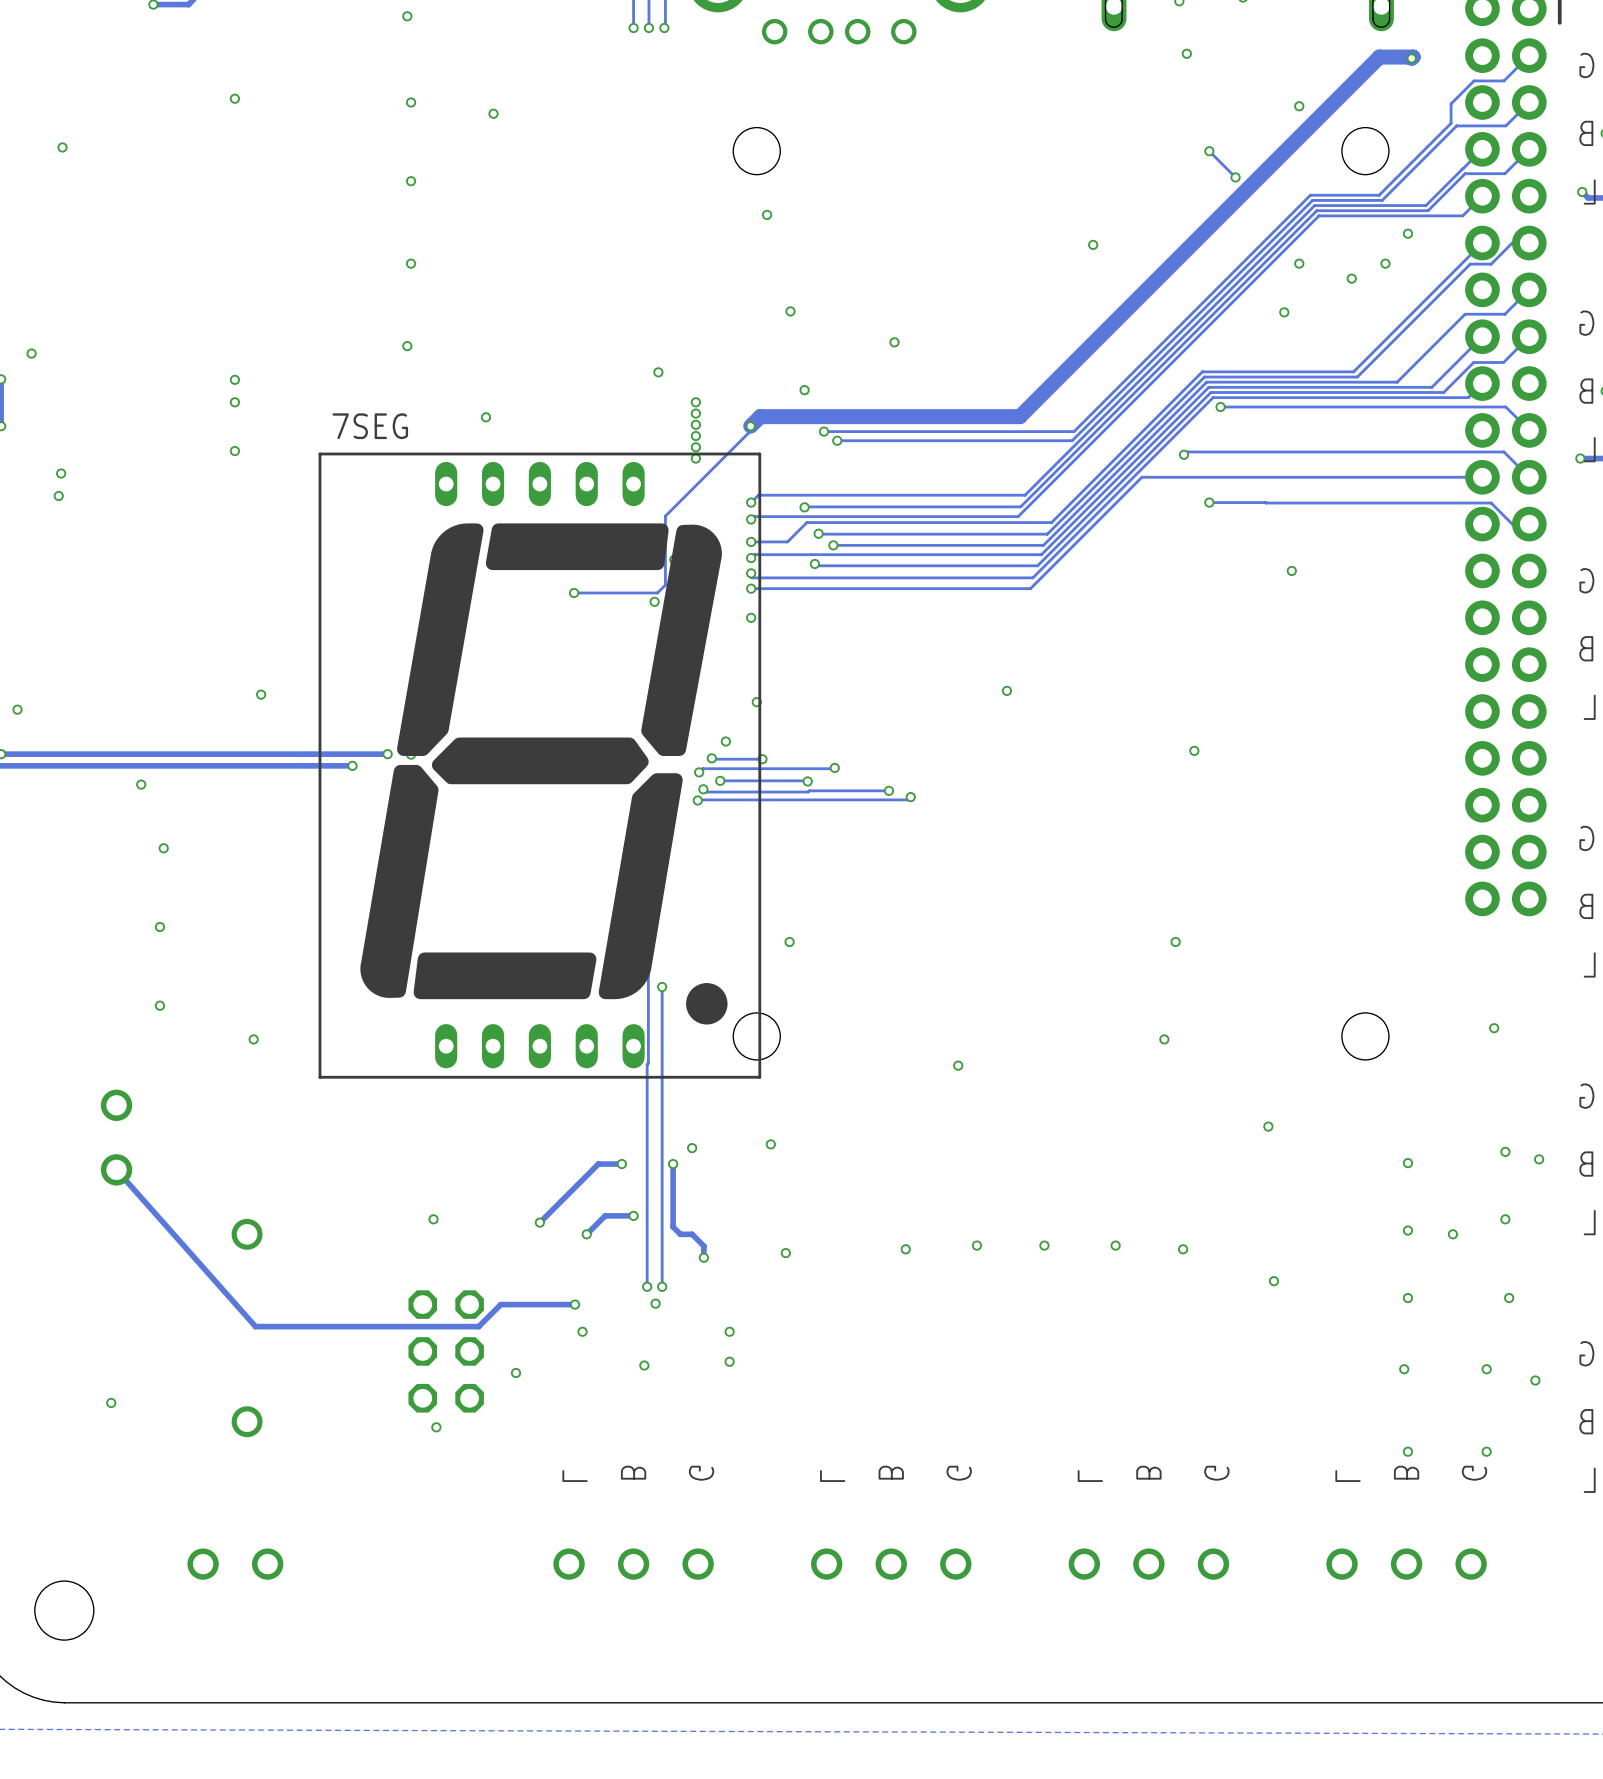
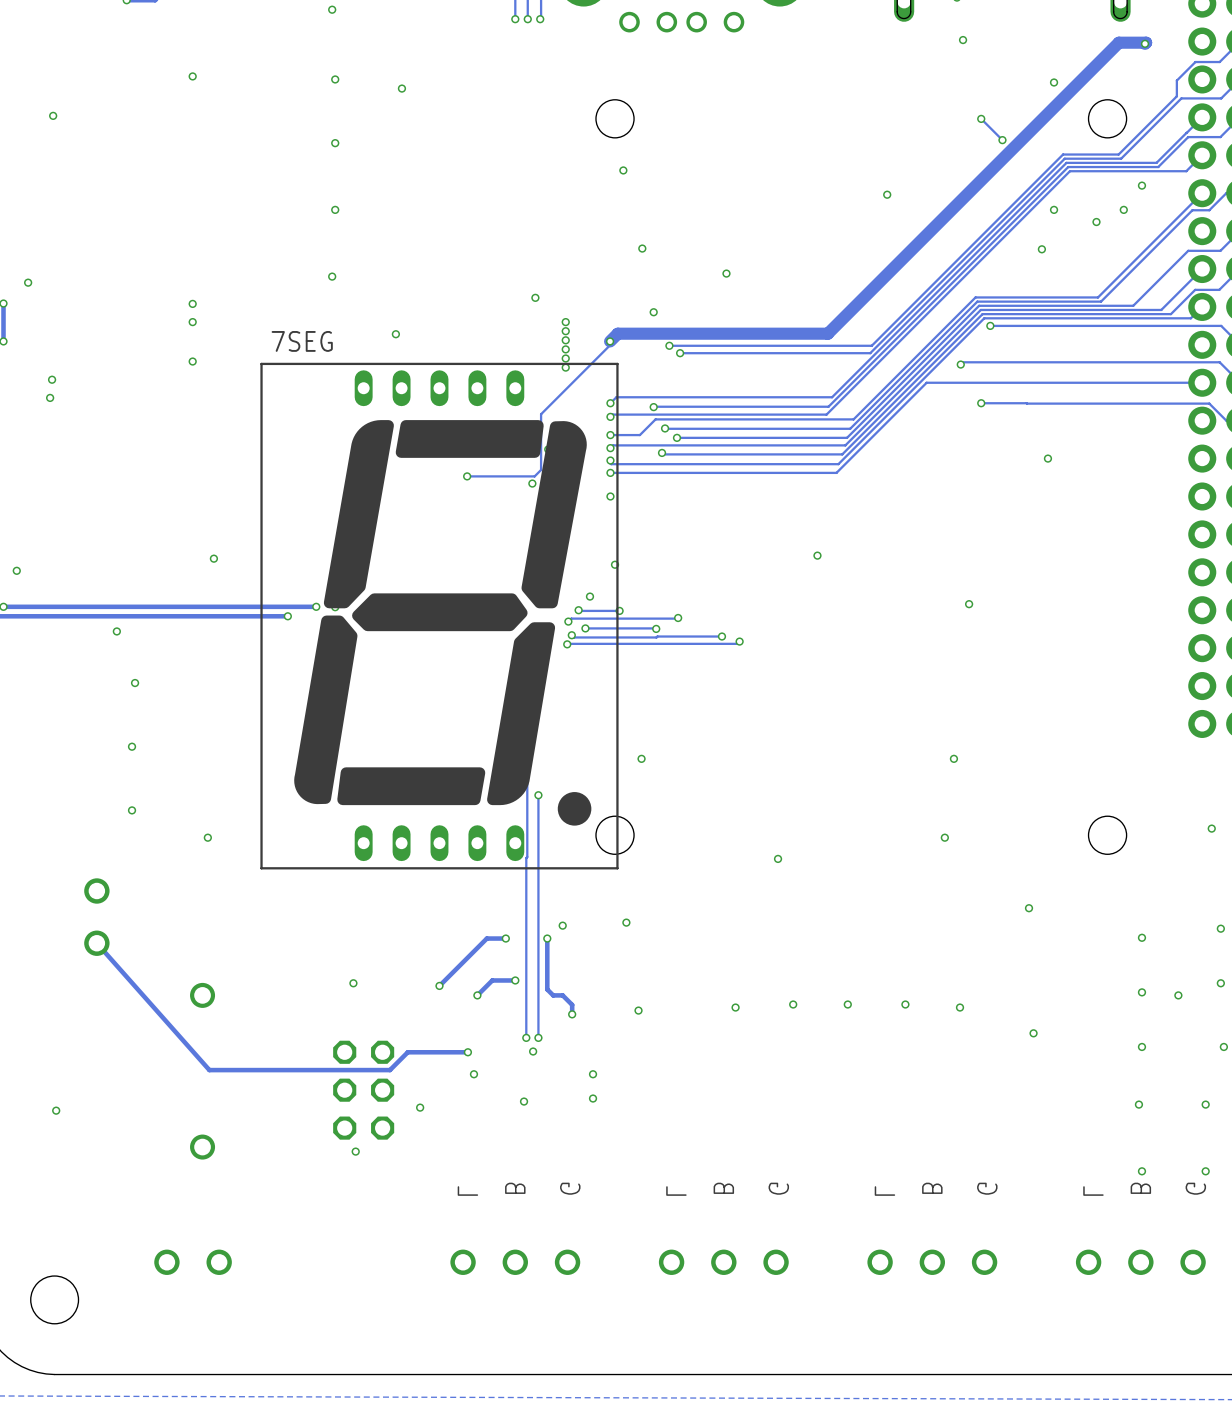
via position: (111, 1402) -> (56, 1110)

